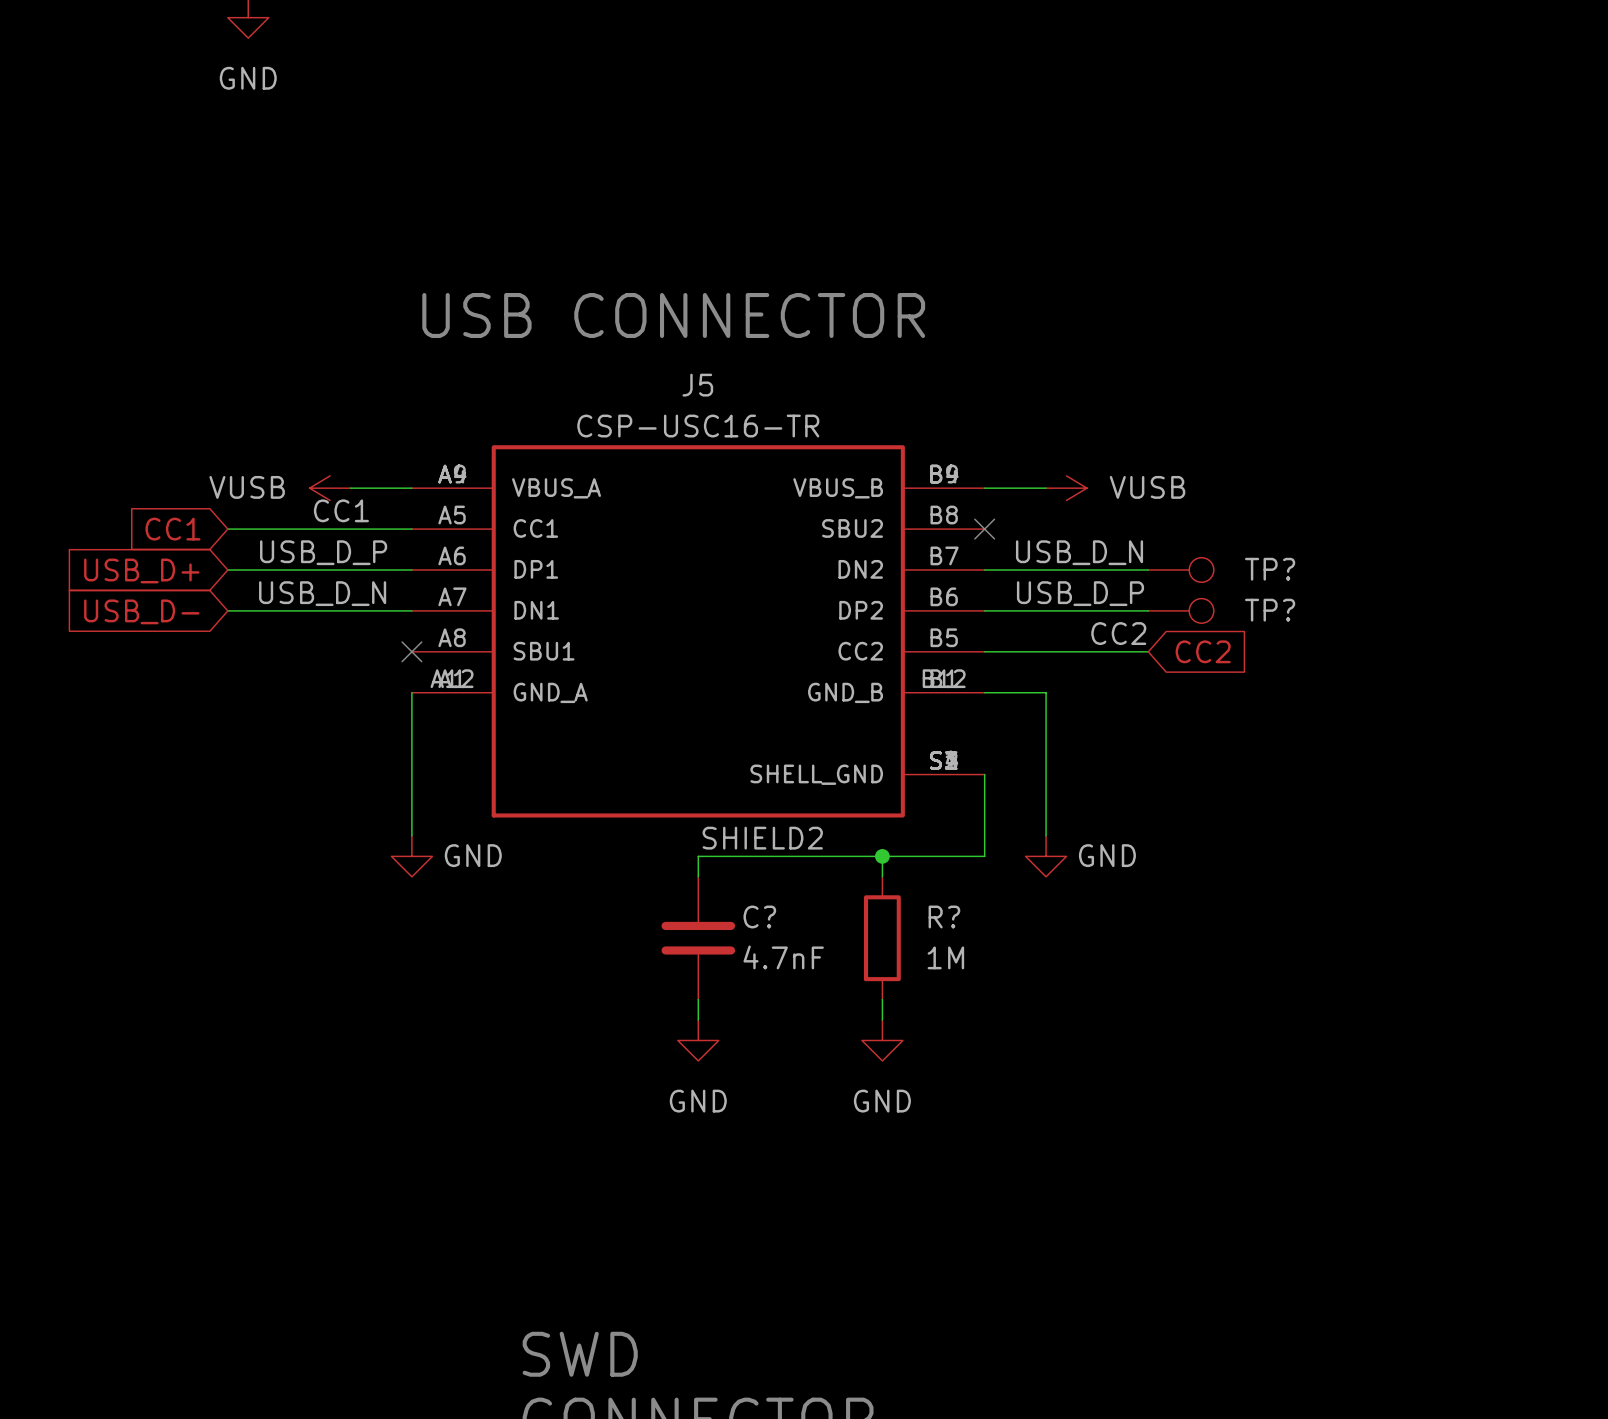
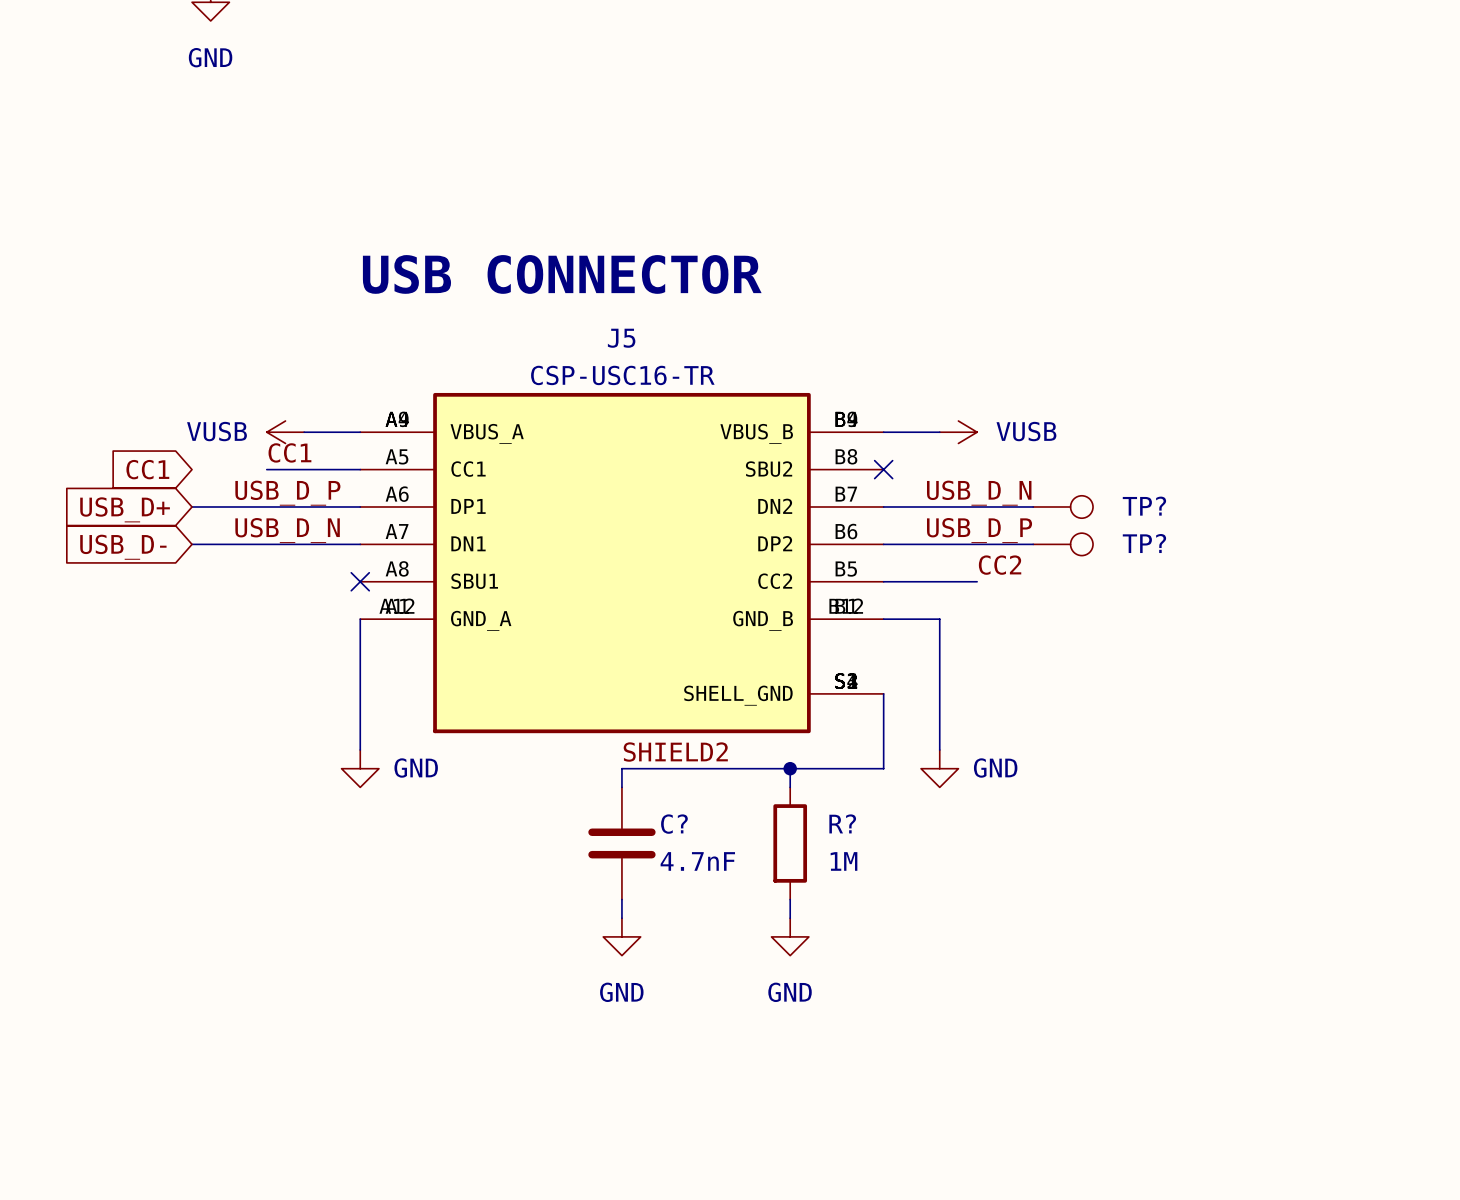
wire: (227, 529) (309, 529) -> none
wire: (1086, 651) (1148, 651) -> none
global label: CC2 (1203, 651) -> none

